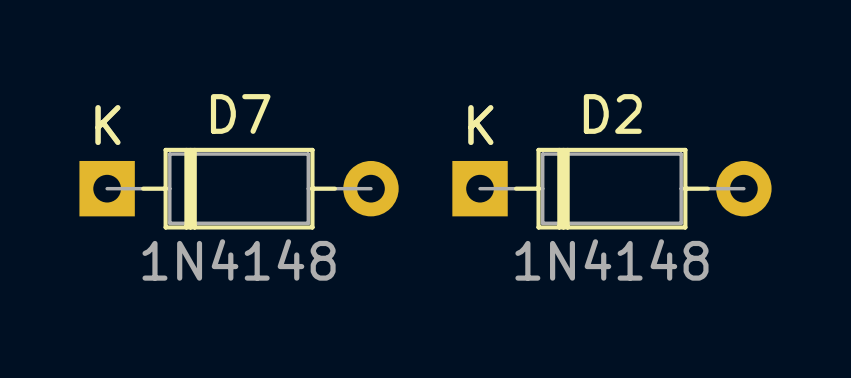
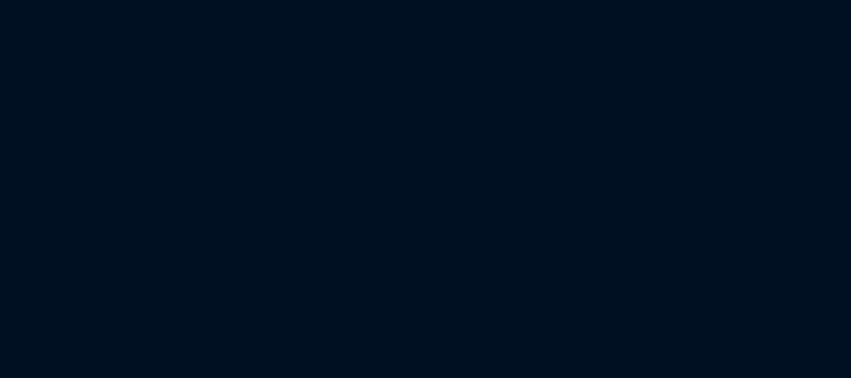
D7: 1N4148 (239, 188) -> none
D2: 1N4148 (611, 188) -> none

